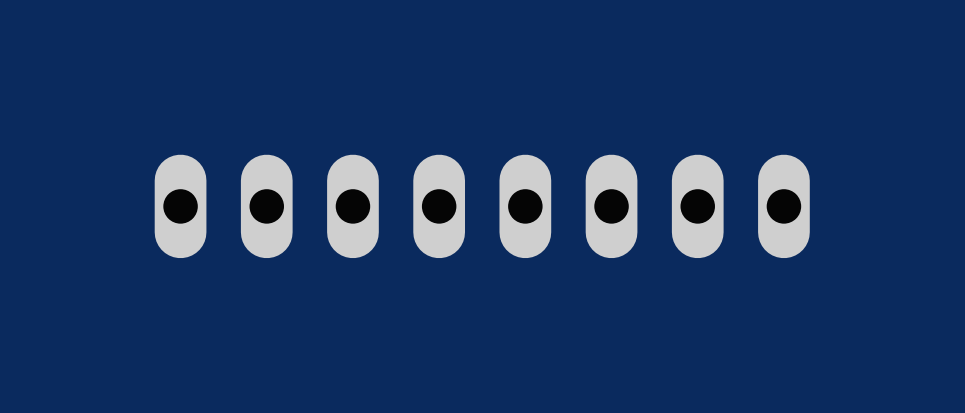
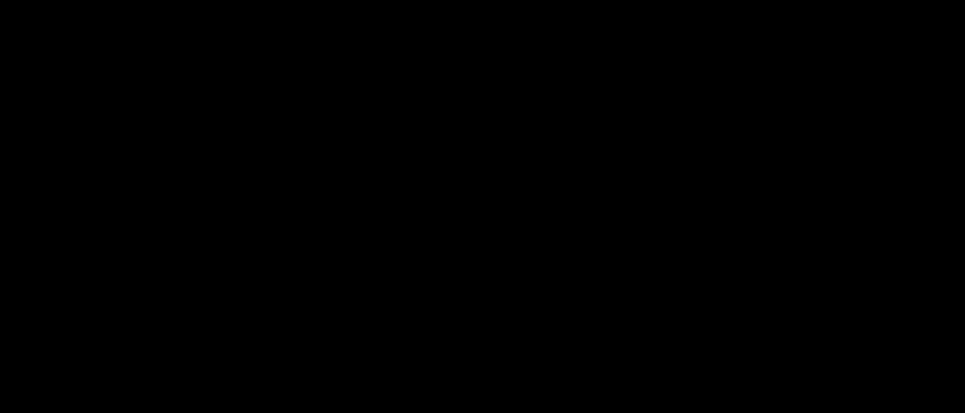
part: (482, 206) -> none

